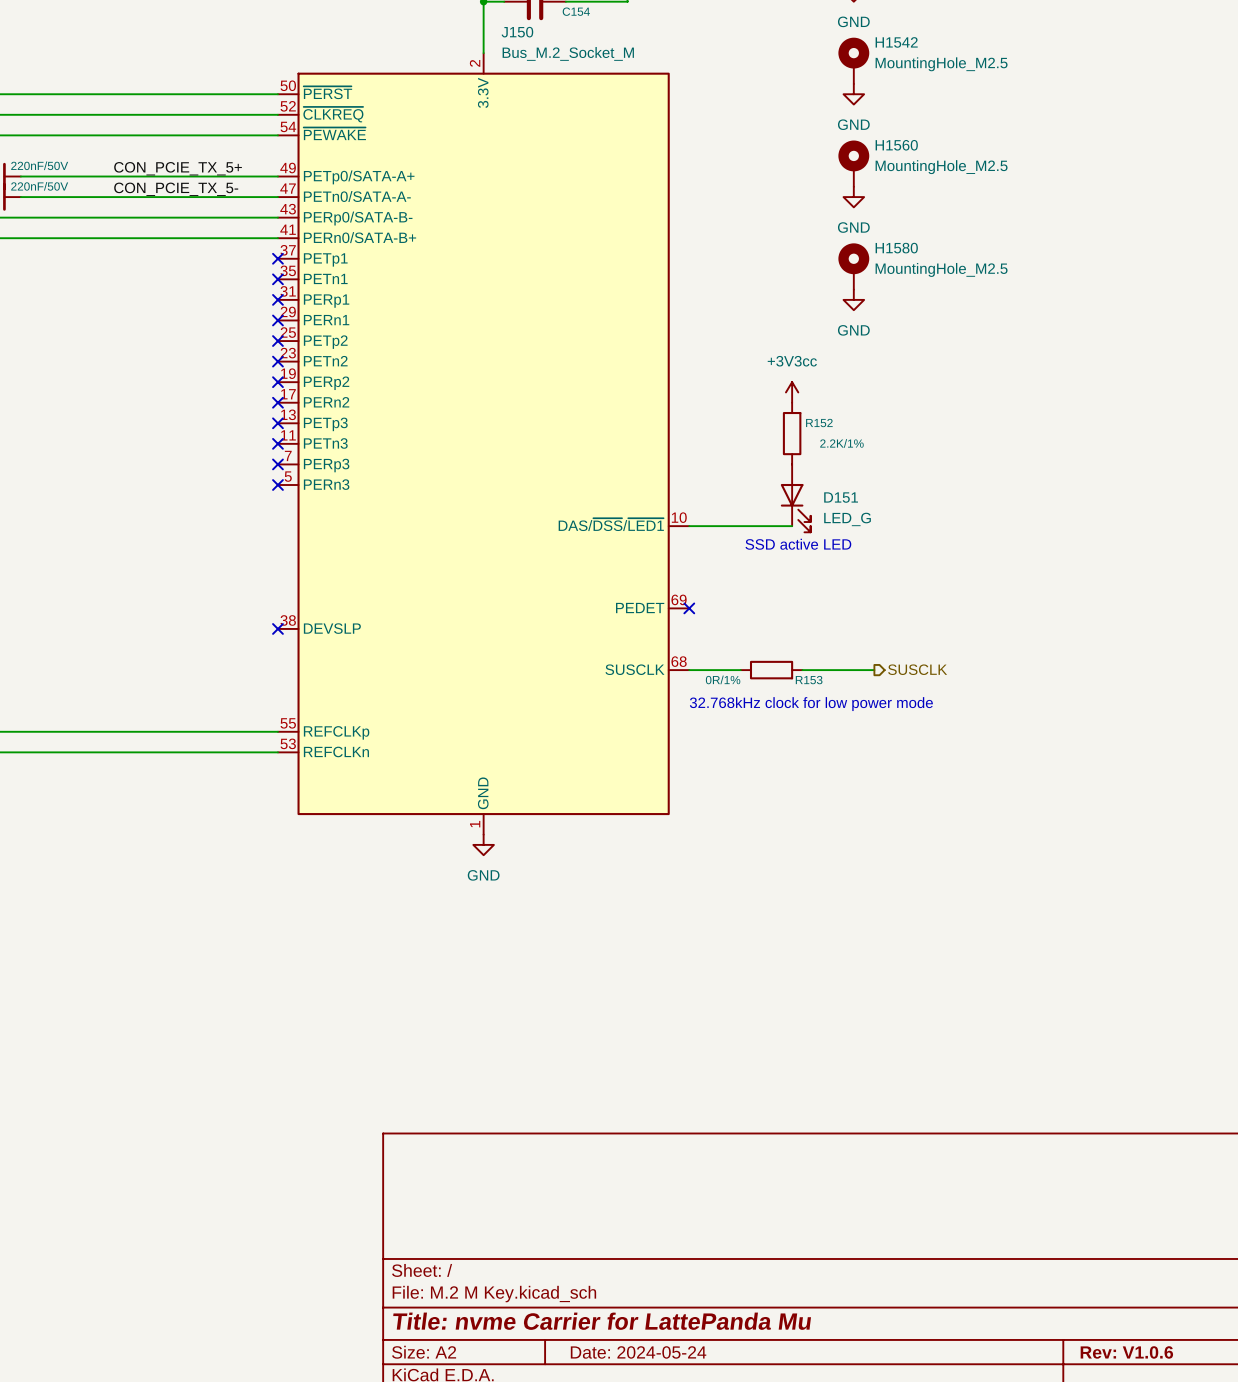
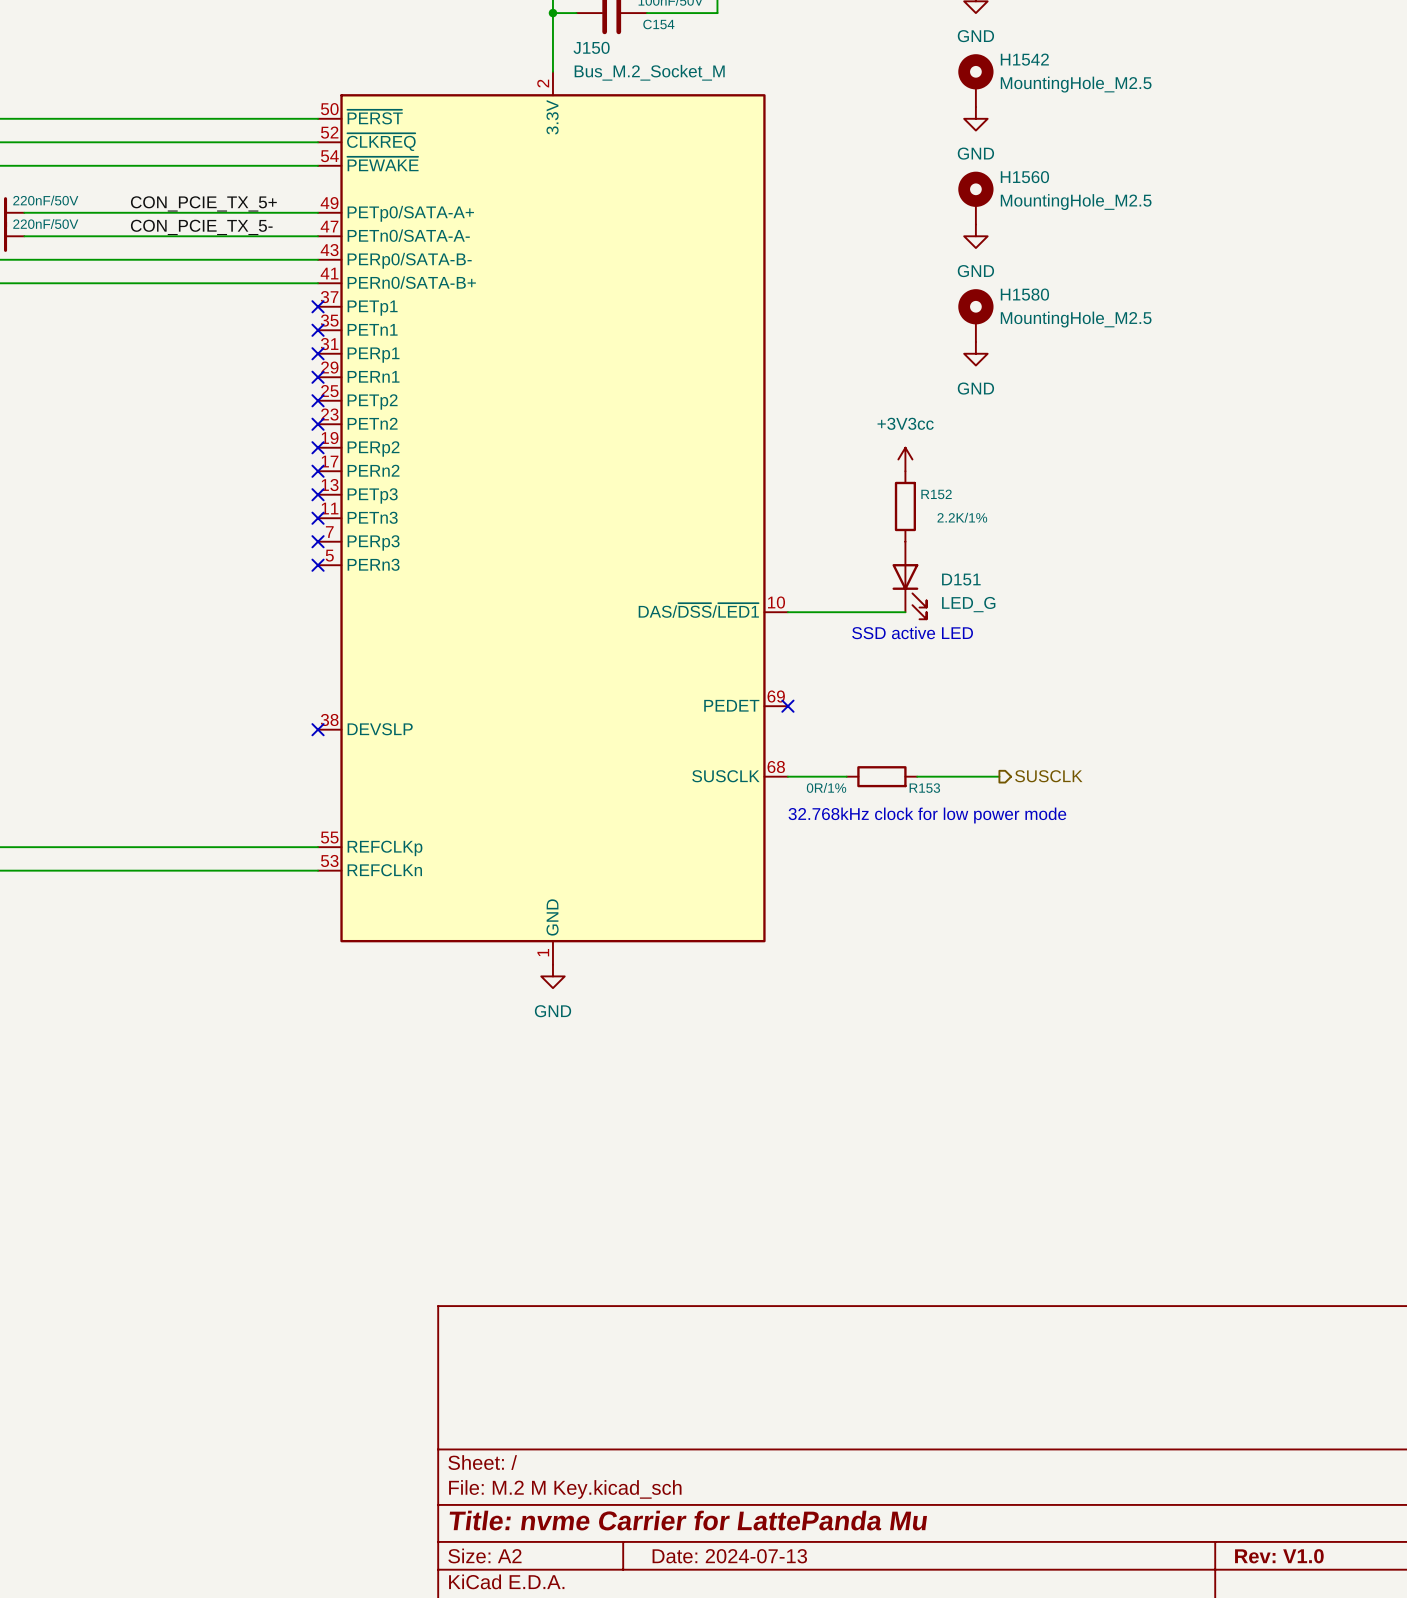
title block: Date: 2024-05-24 (638, 1352) -> Date: 2024-07-13 (729, 1556)
title block: Rev: V1.0.6 (1126, 1352) -> Rev: V1.0 (1279, 1556)

